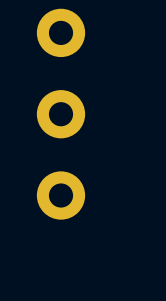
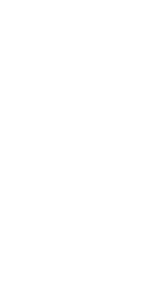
part: (61, 32) -> none
part: (61, 114) -> none
part: (61, 195) -> none

